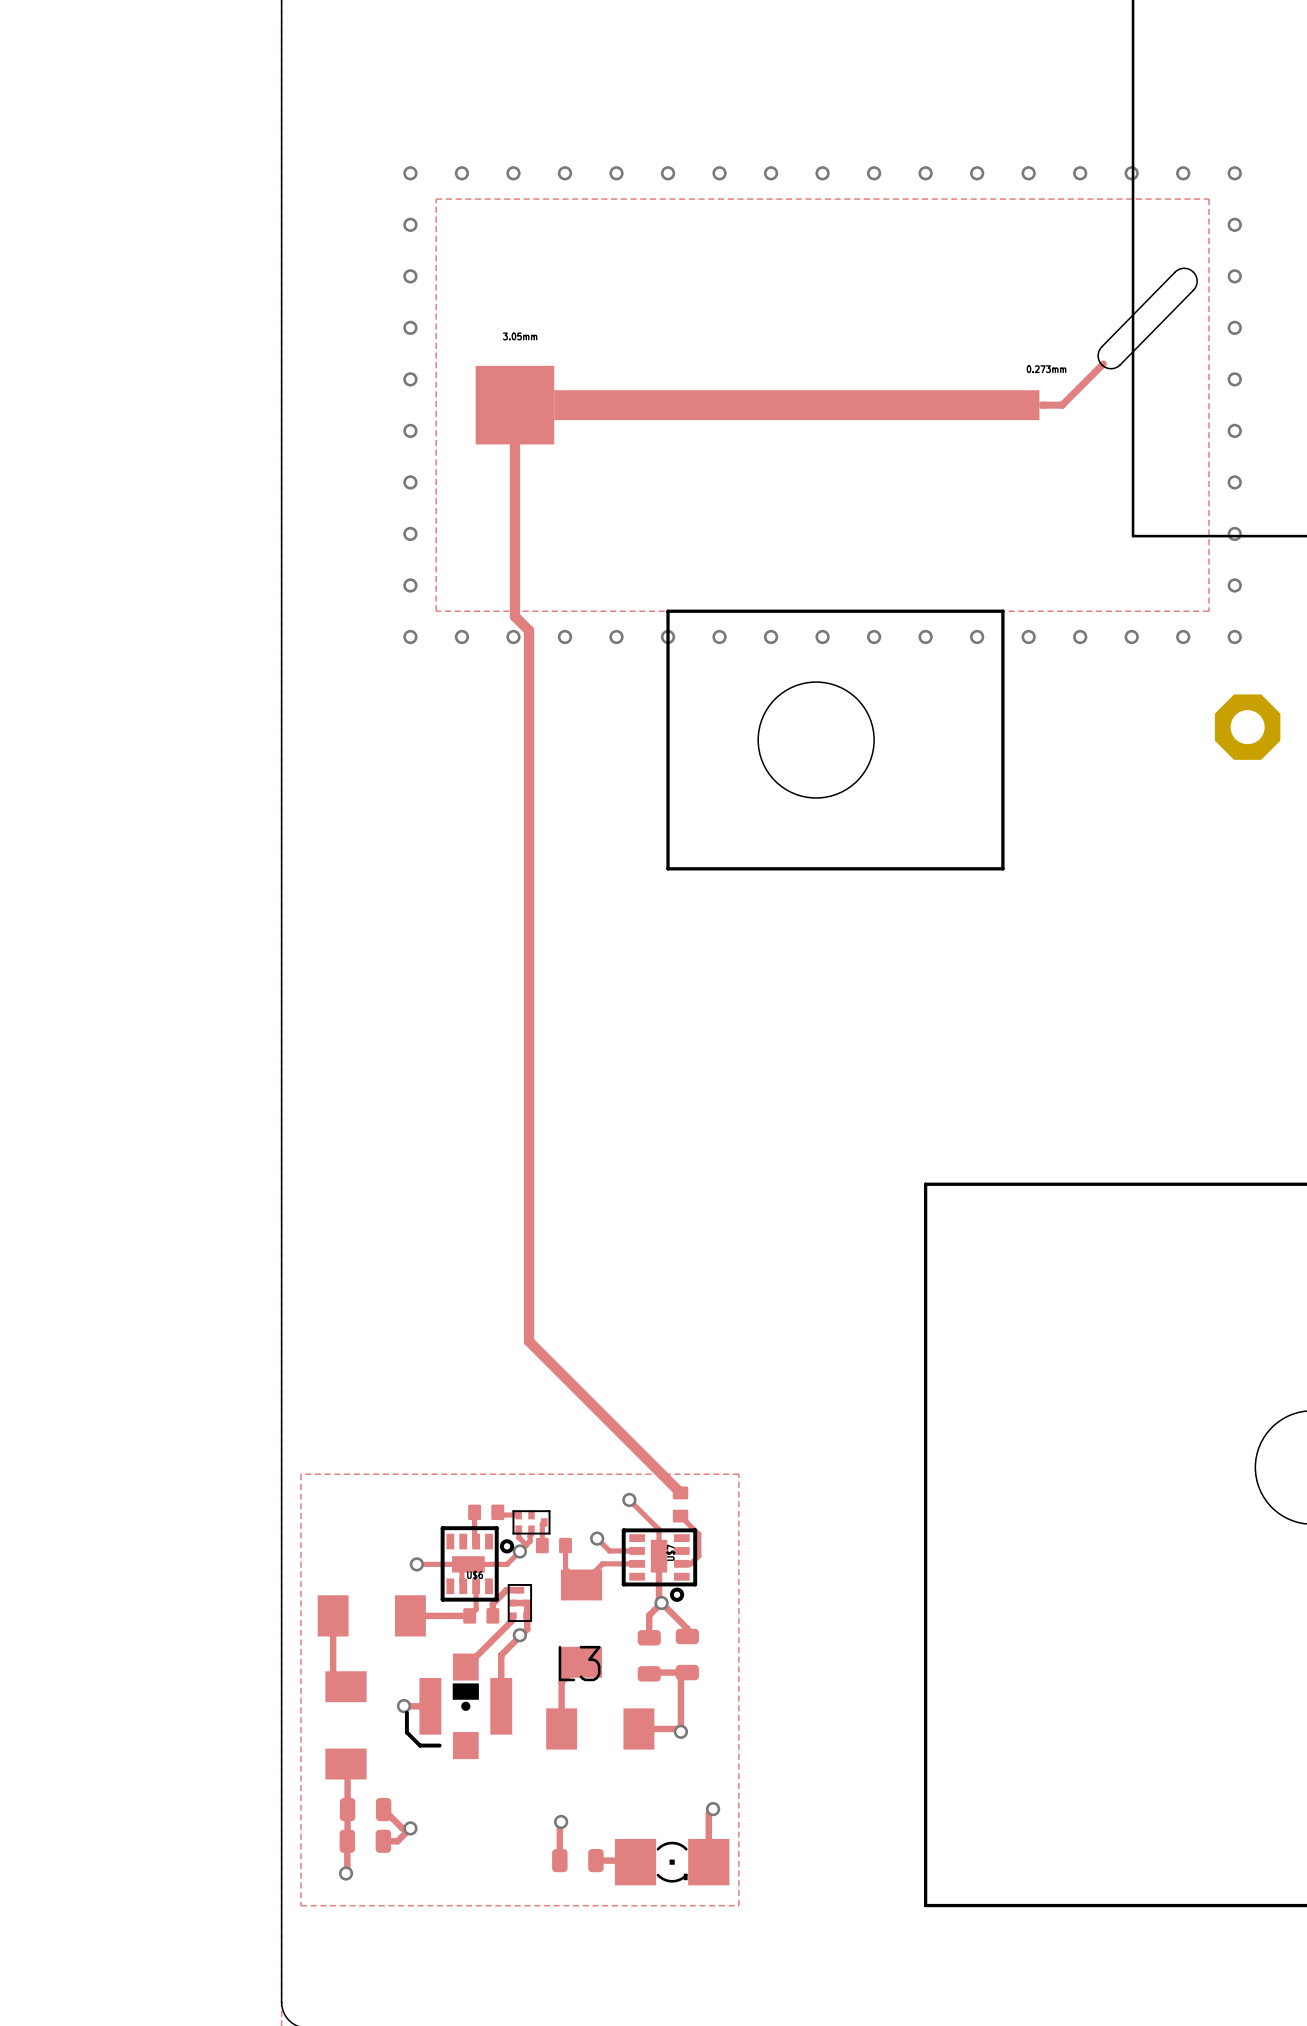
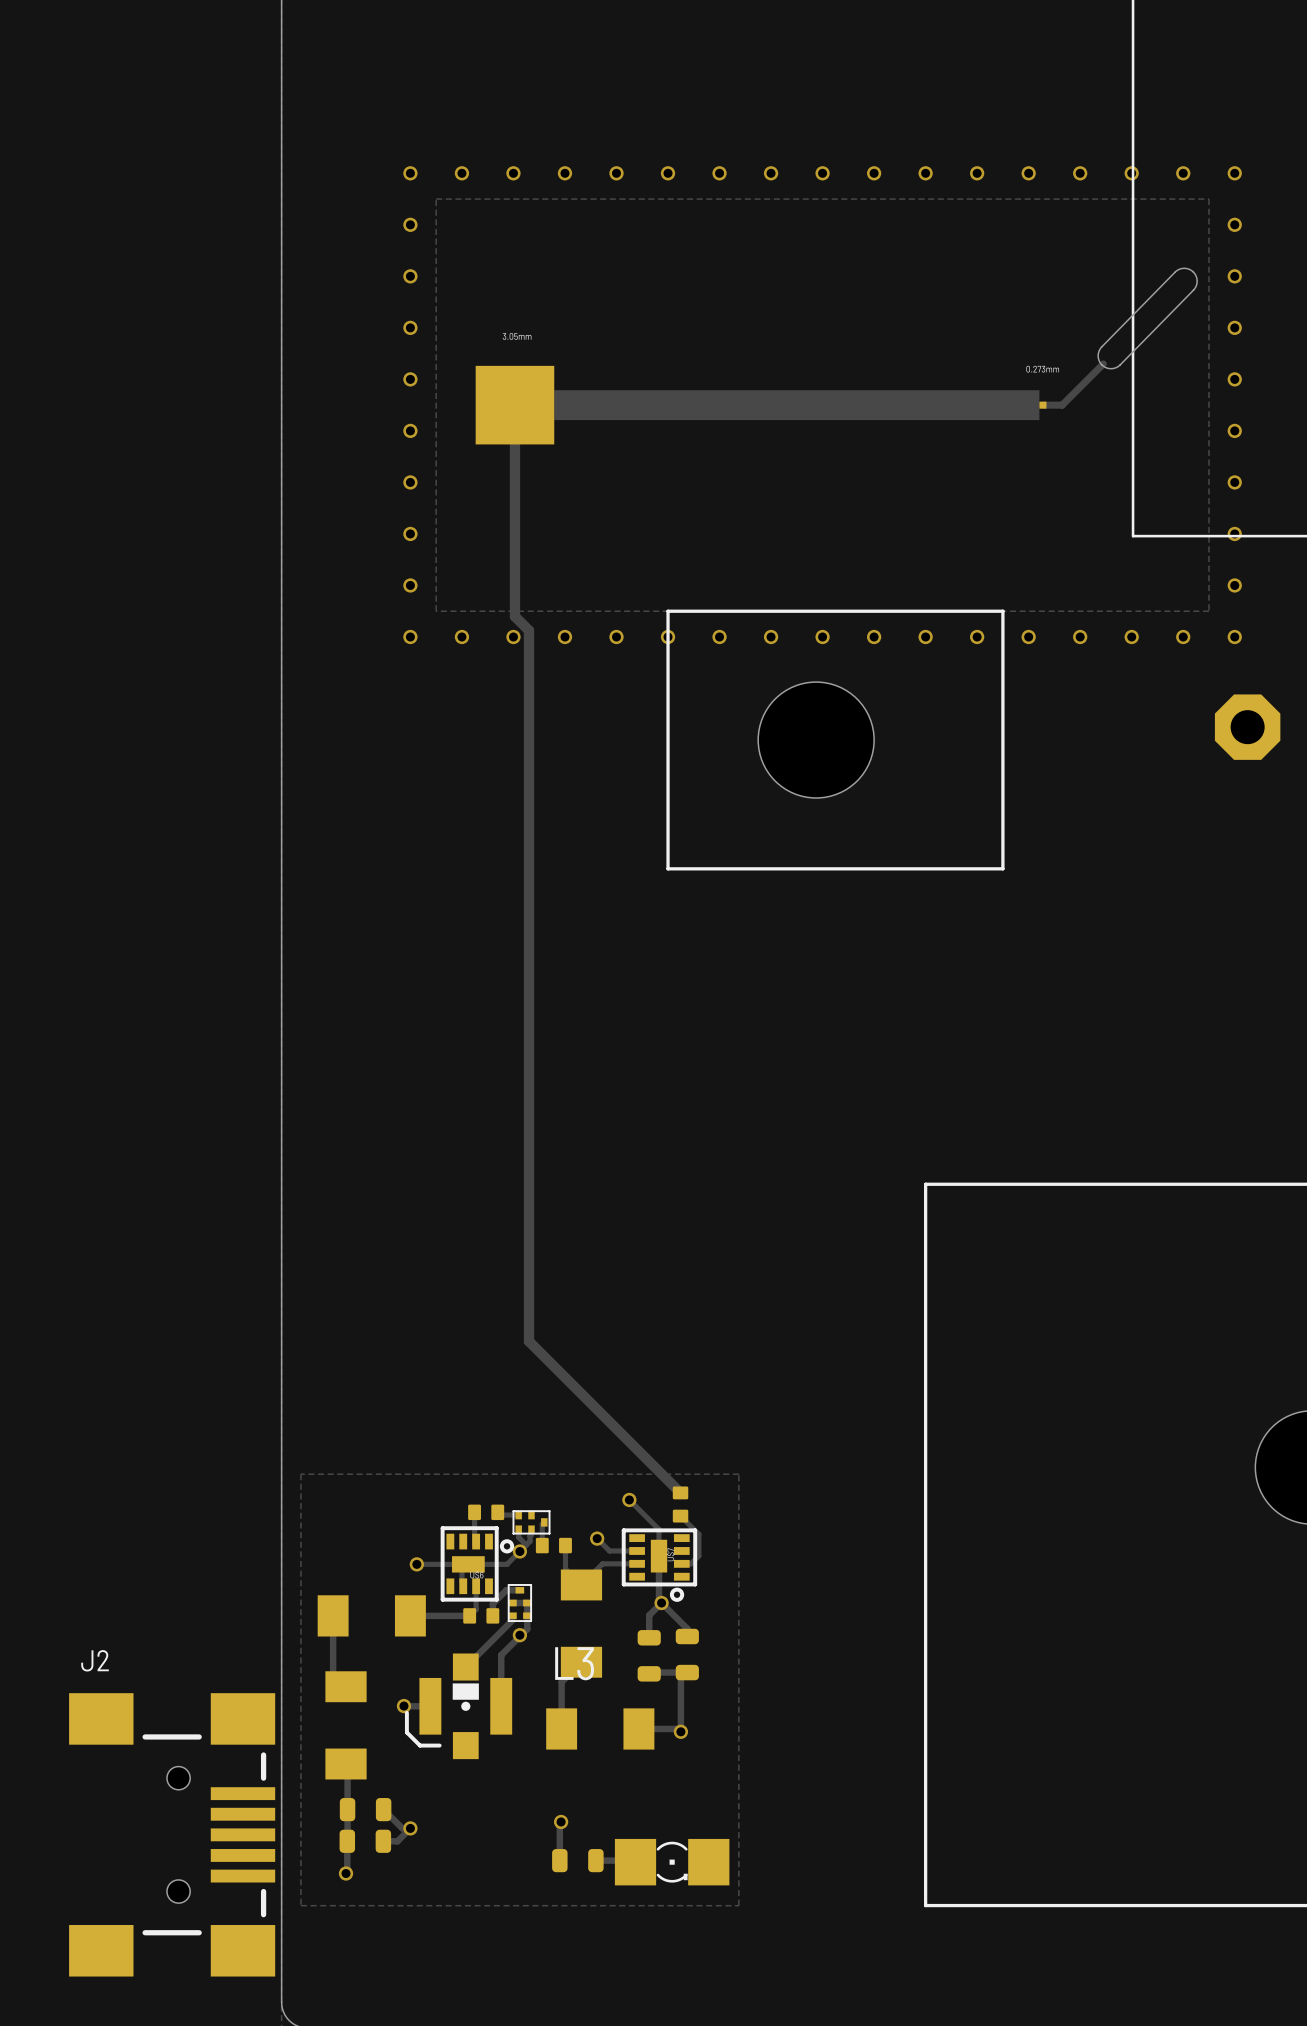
track: (713, 1809) (708, 1813) (708, 1862) -> none
via: (713, 1809) -> none
J2: none -> (172, 1834)

